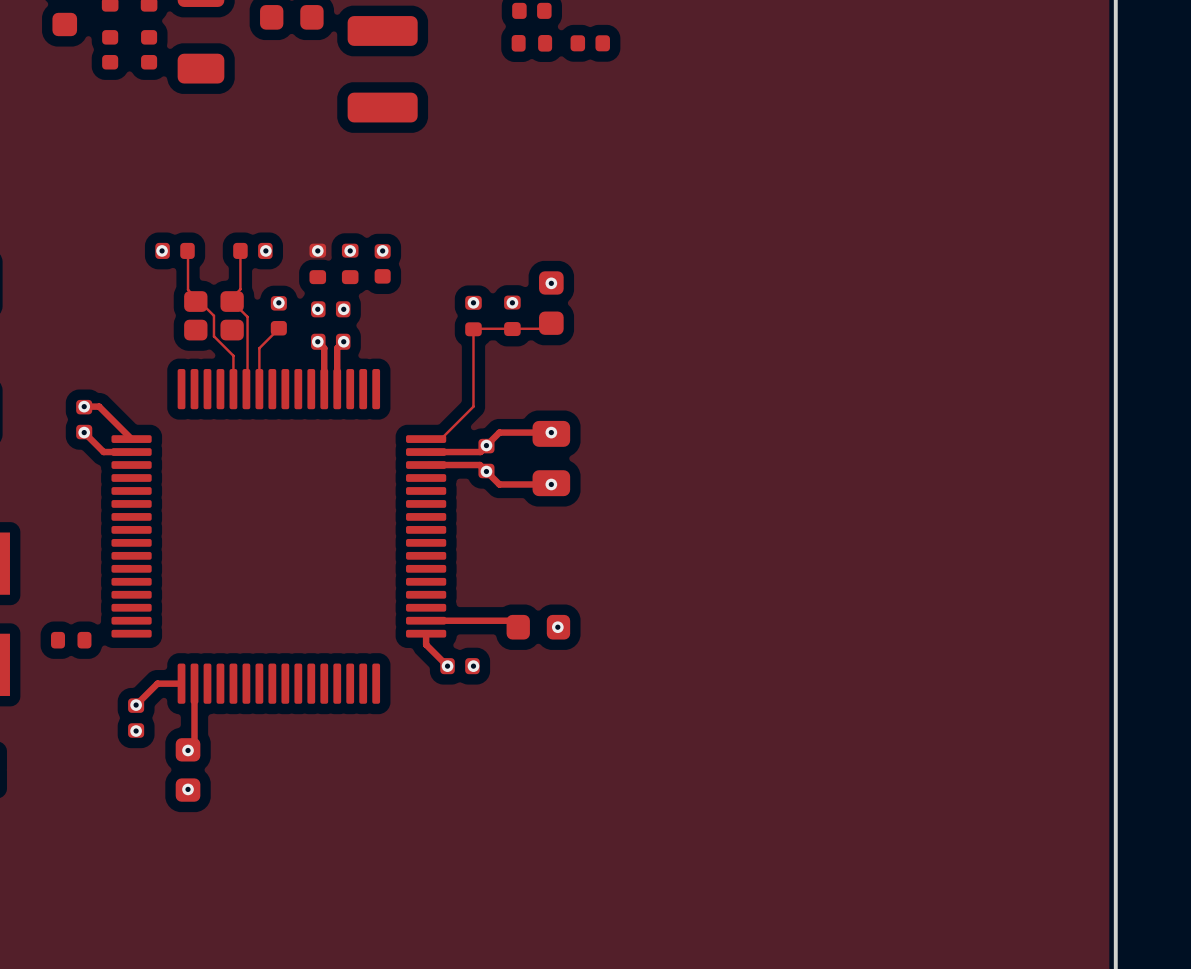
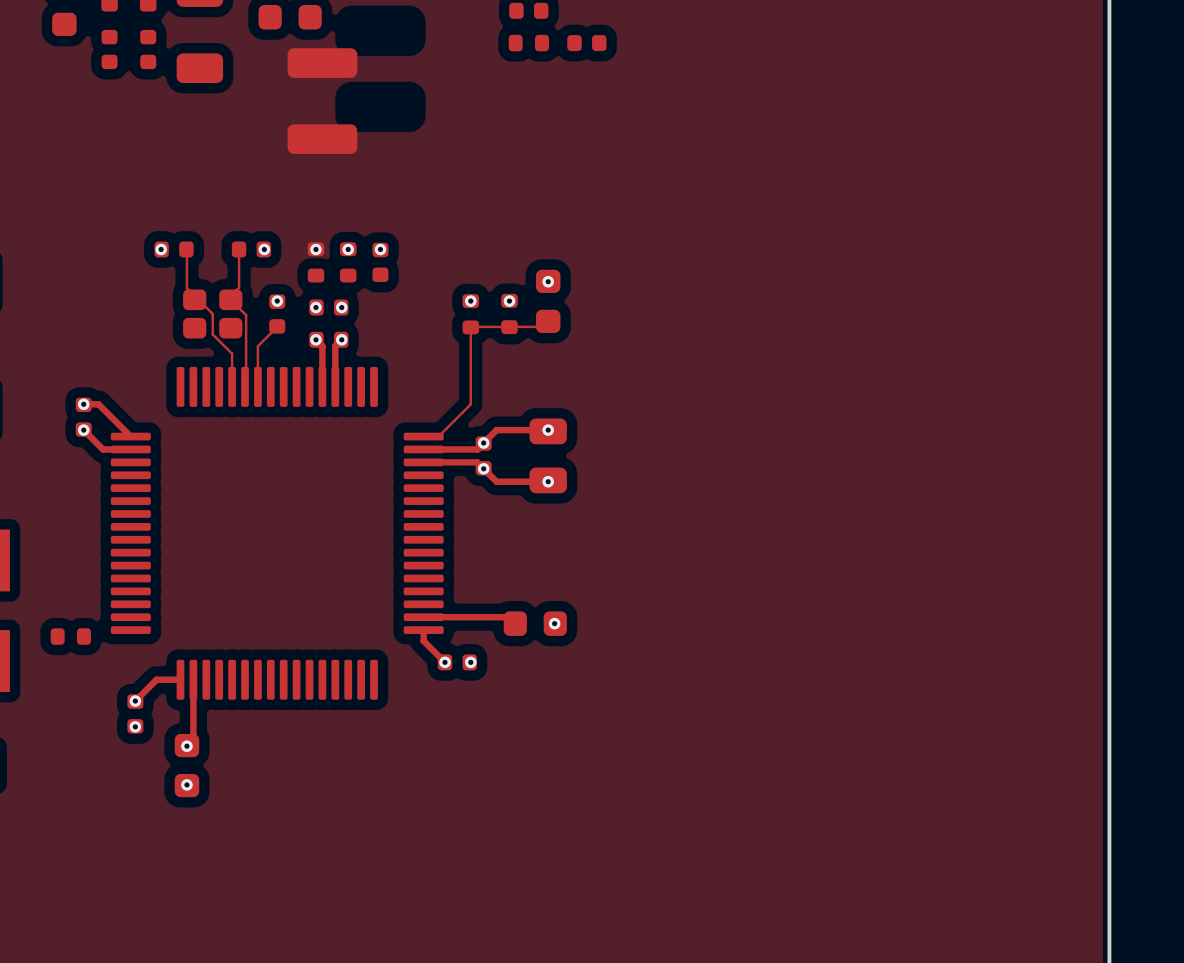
part position: (382, 69) -> (322, 101)

